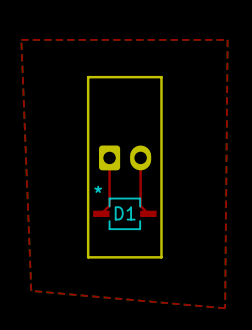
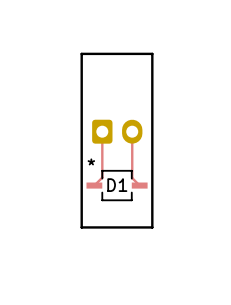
top zone outline: (21, 39) (227, 39) (225, 308) (31, 290) (21, 39) -> none

